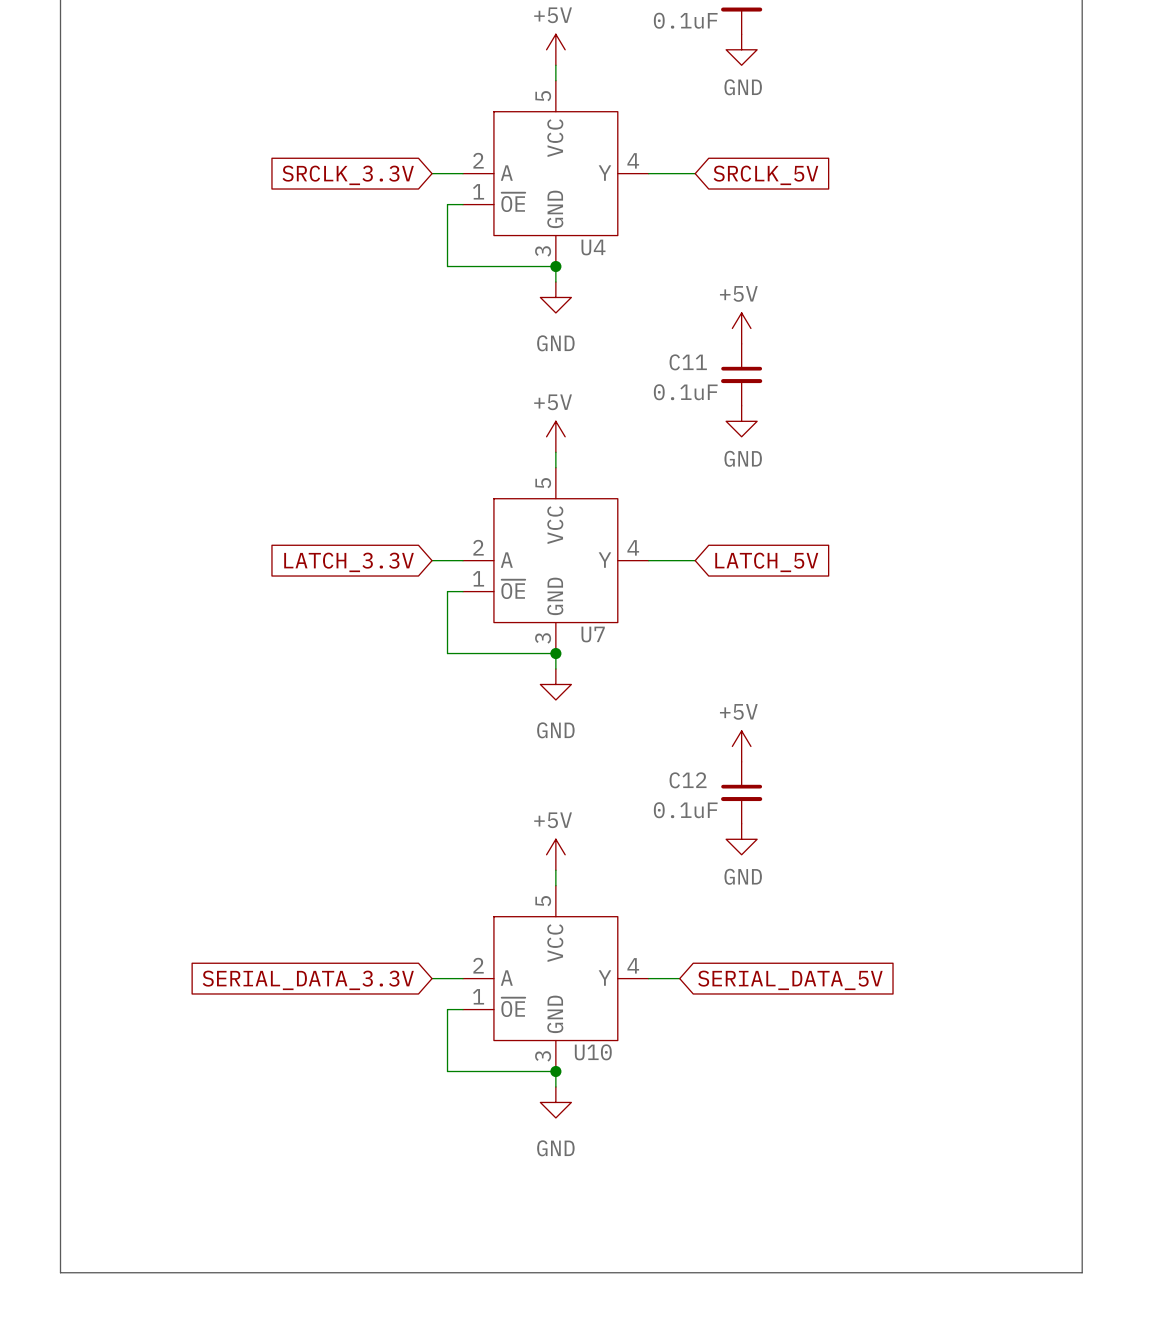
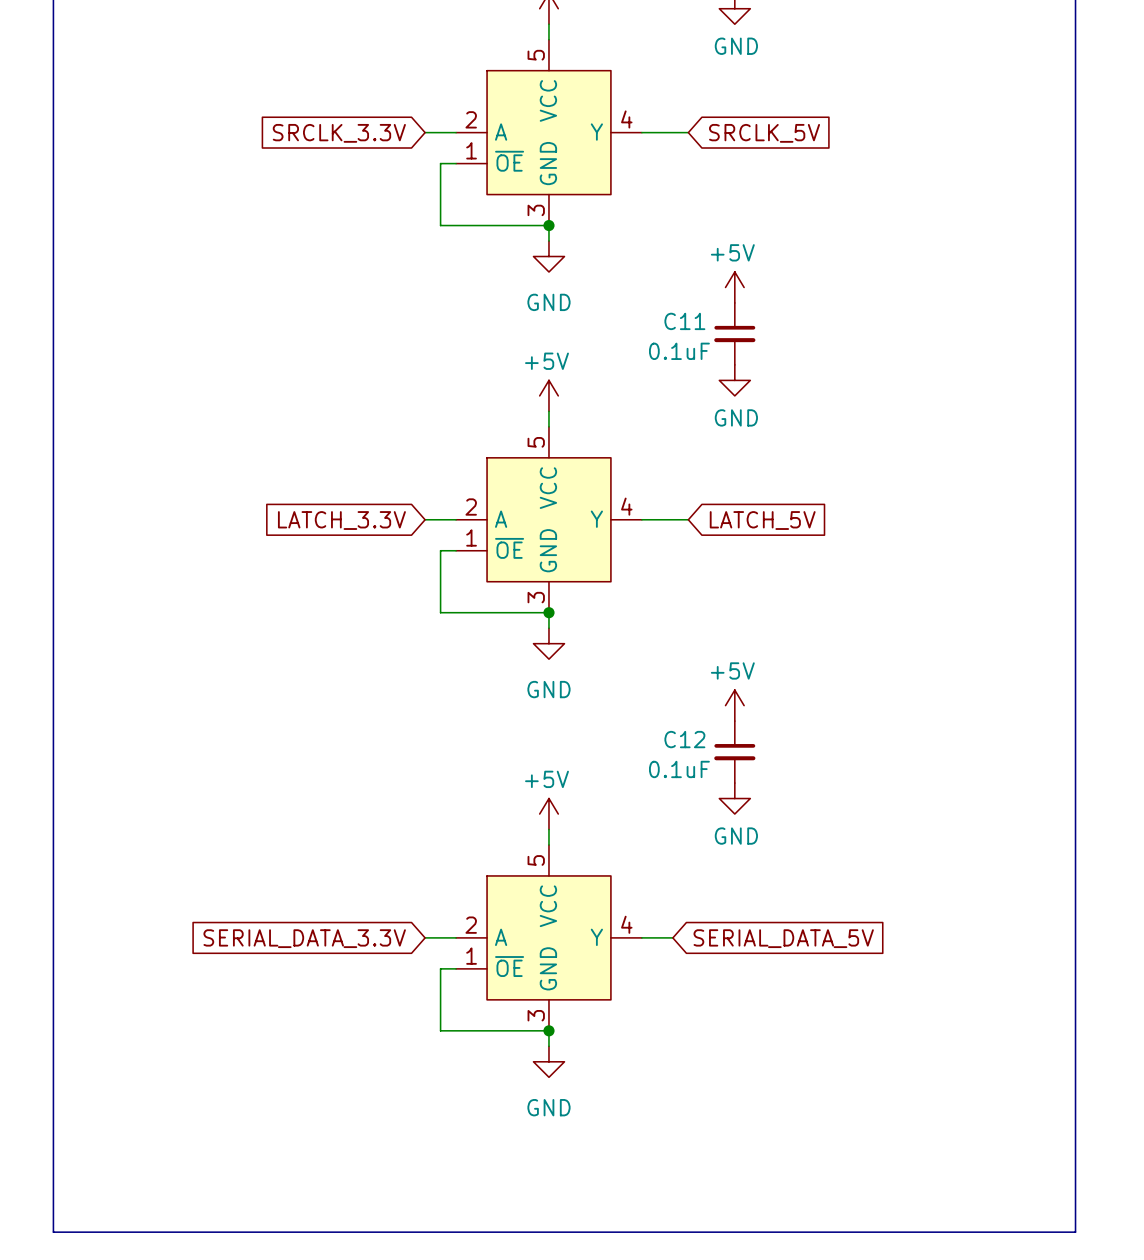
U4 name: U4 (593, 247) -> none
U7 name: U7 (593, 634) -> none
U10 name: U10 (593, 1052) -> none

